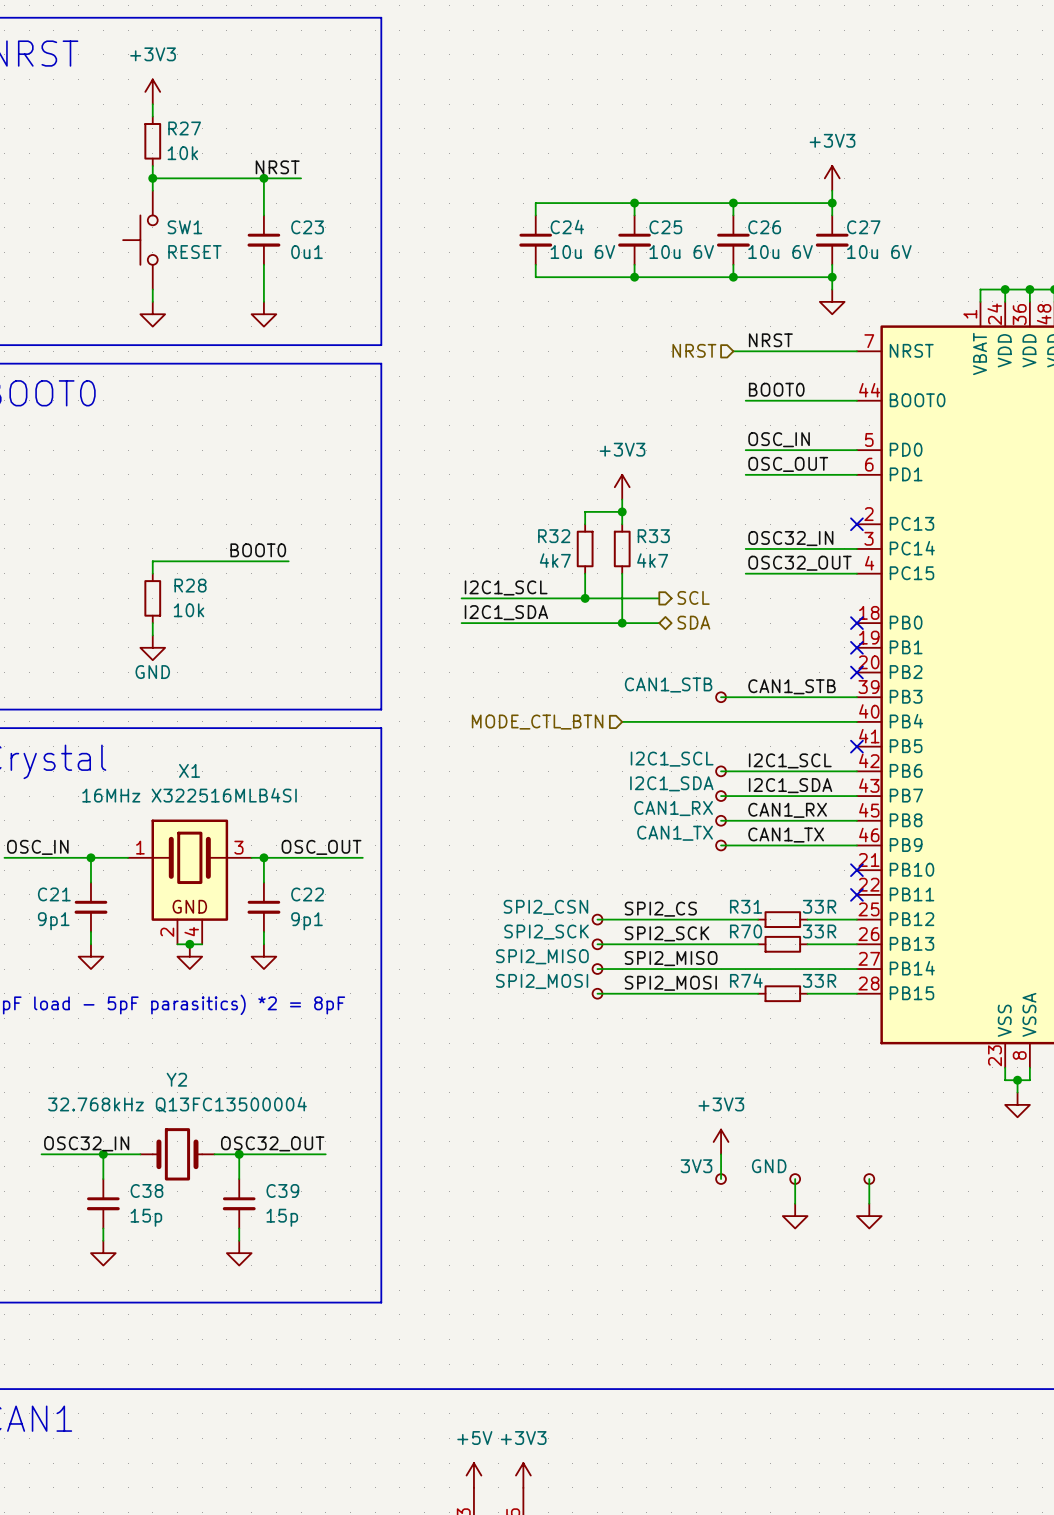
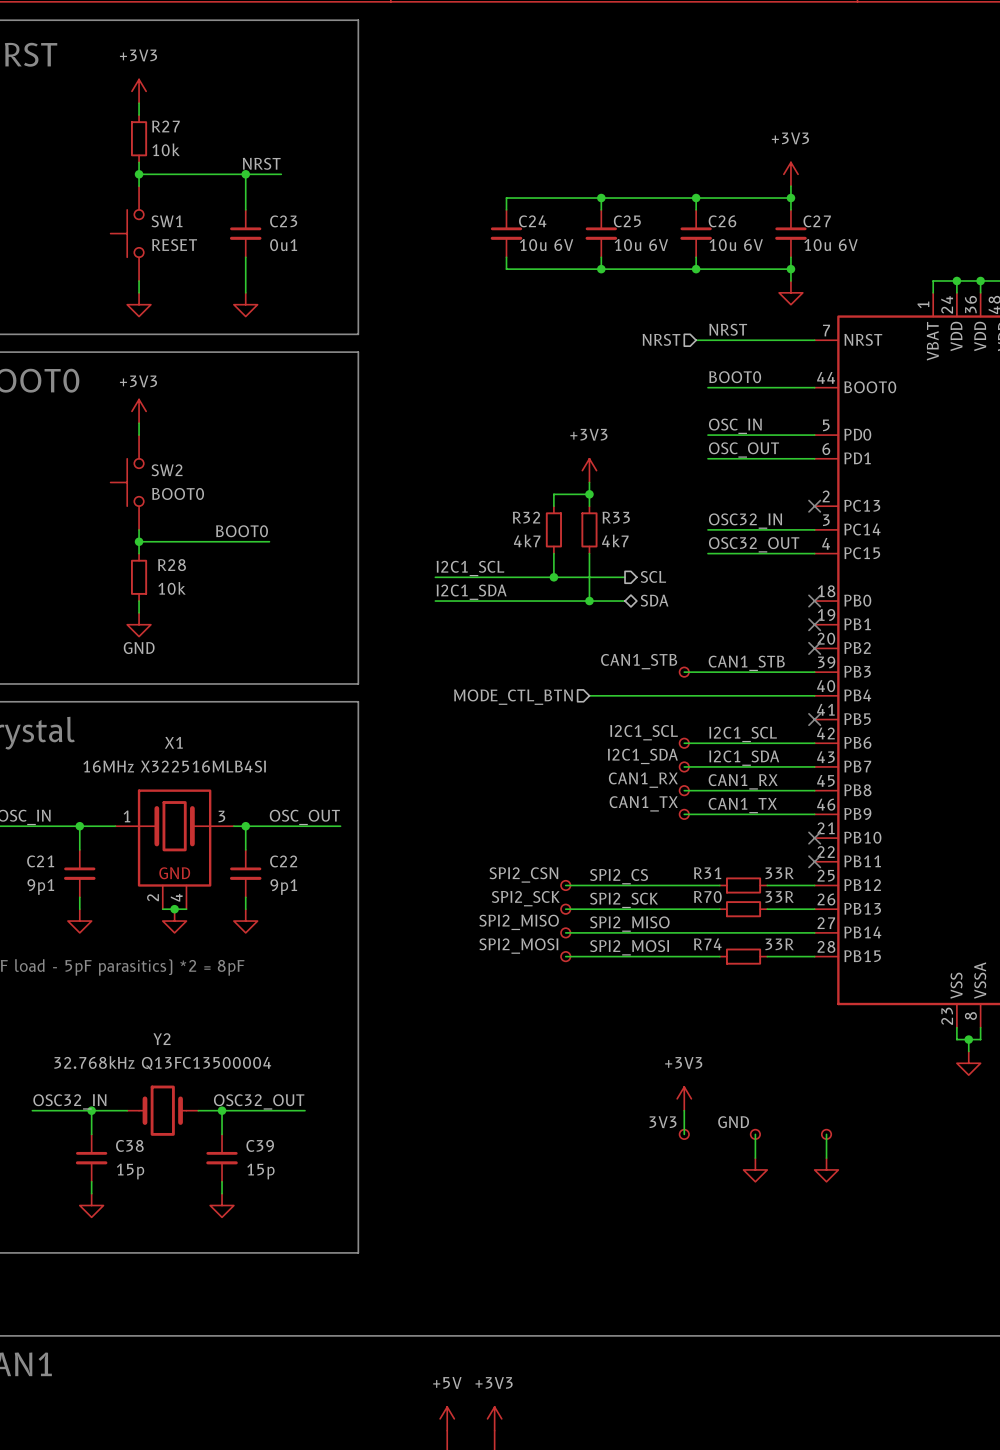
power symbol: none -> +3V3 (139, 411)
wire: none -> (139, 423) (139, 435)
SW2: none -> BOOT0 (127, 482)
wire: none -> (139, 529) (139, 541)
junction: none -> (139, 541)

